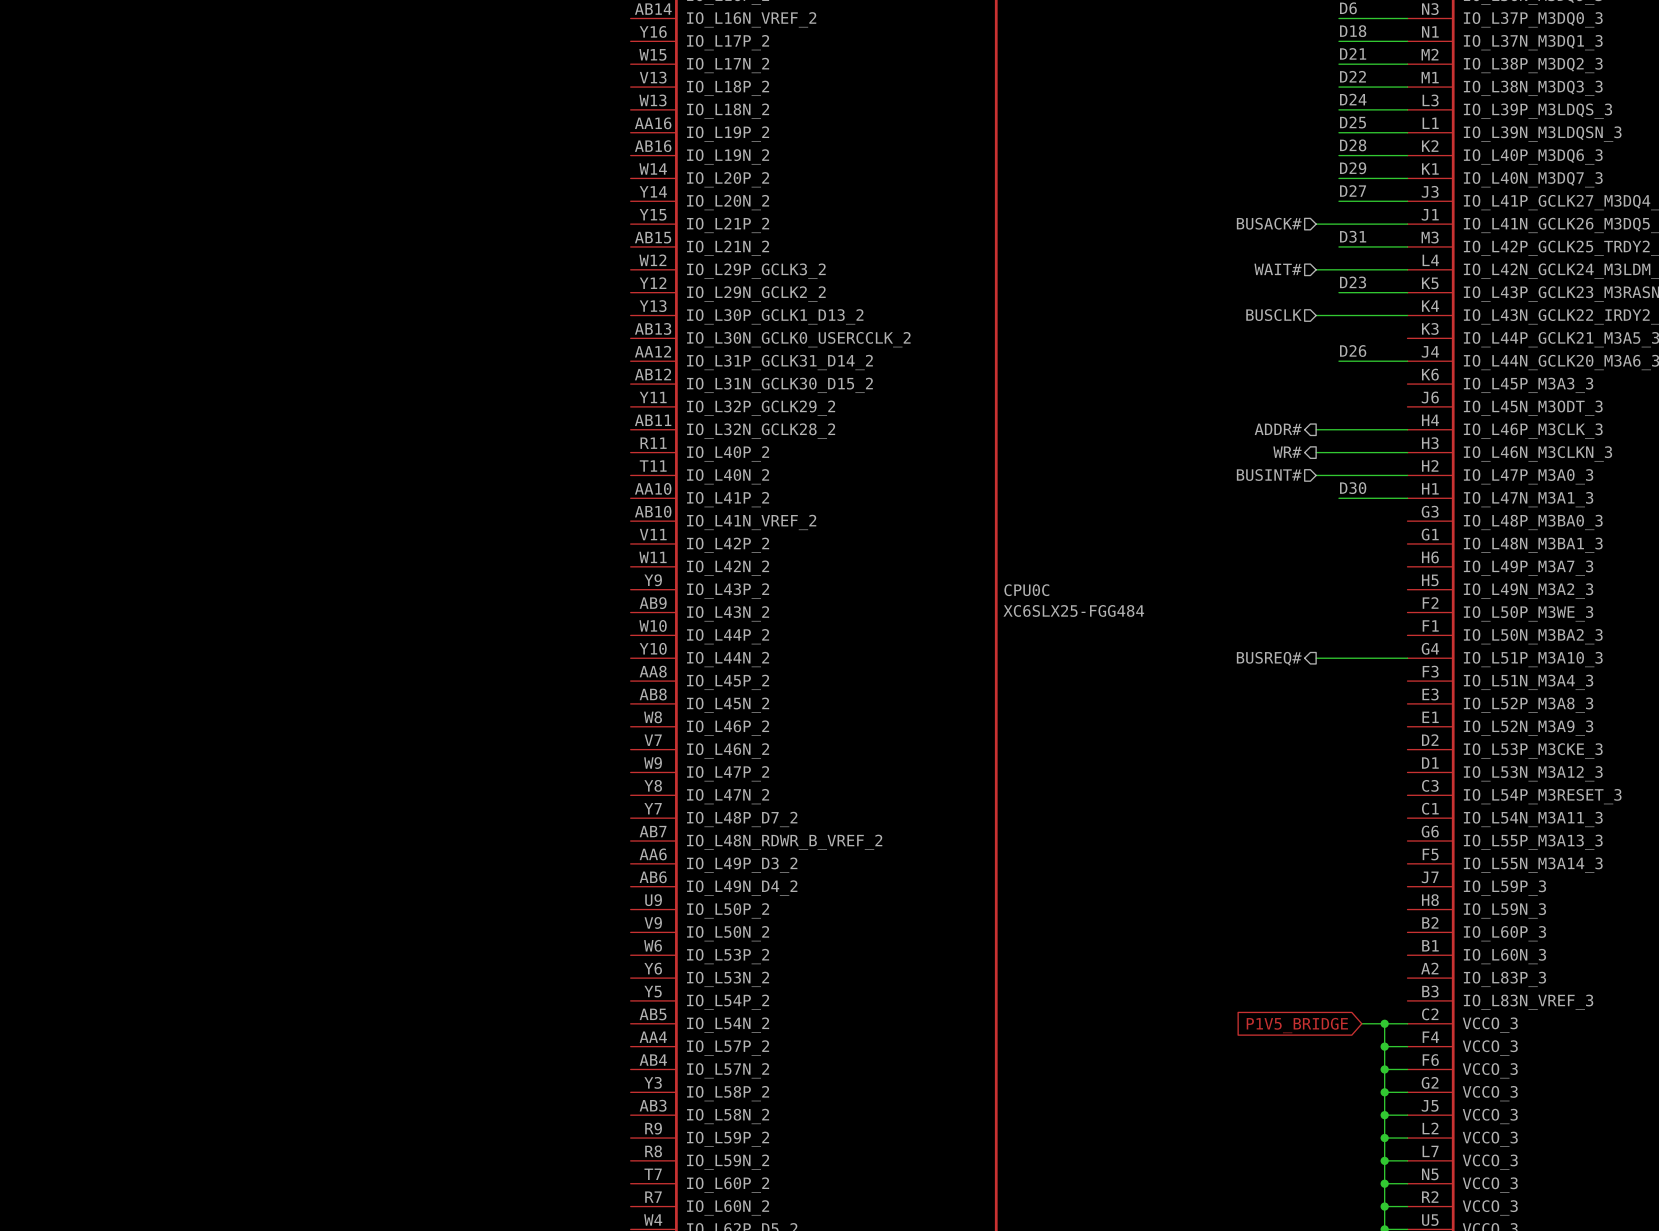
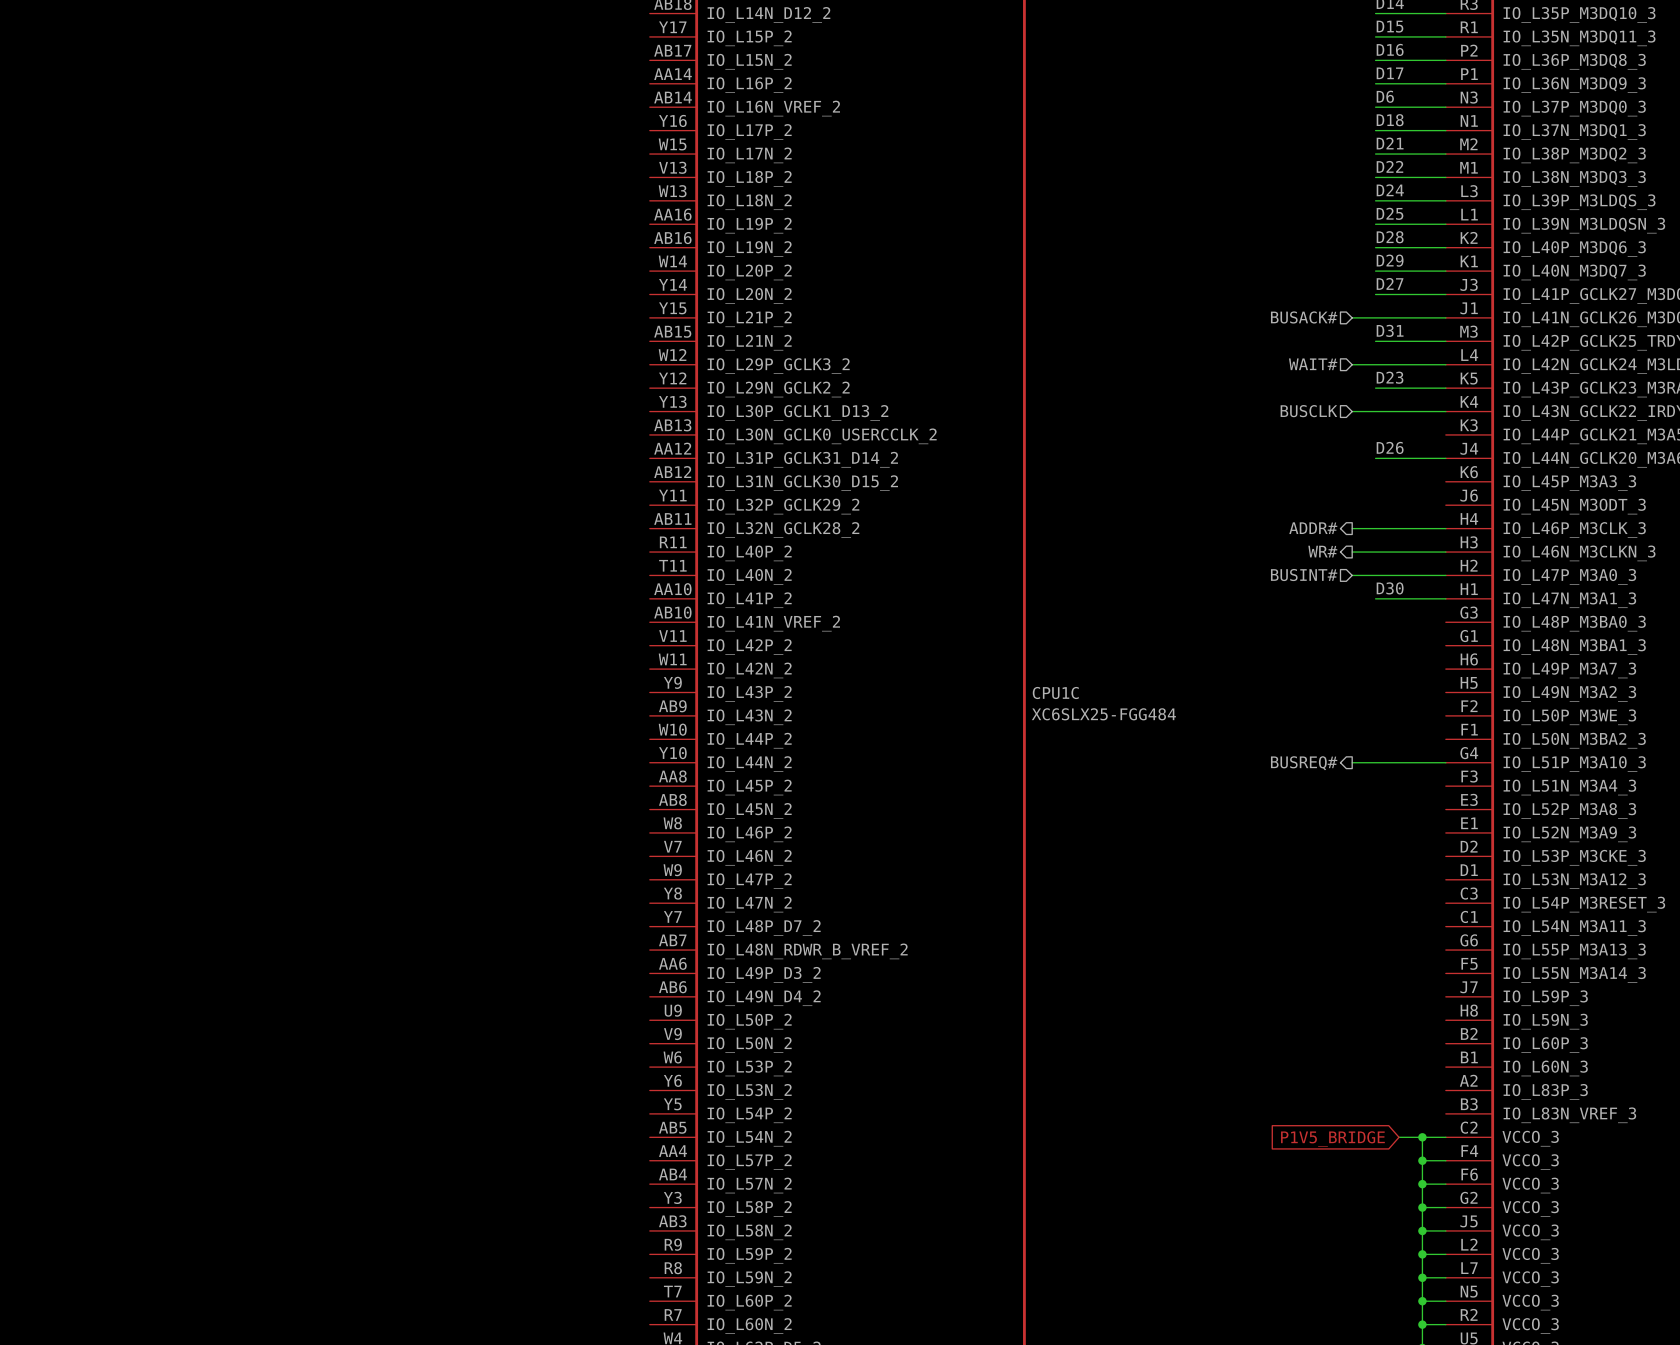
CPU0C name: CPU0C (1026, 590) -> CPU1C (1055, 693)

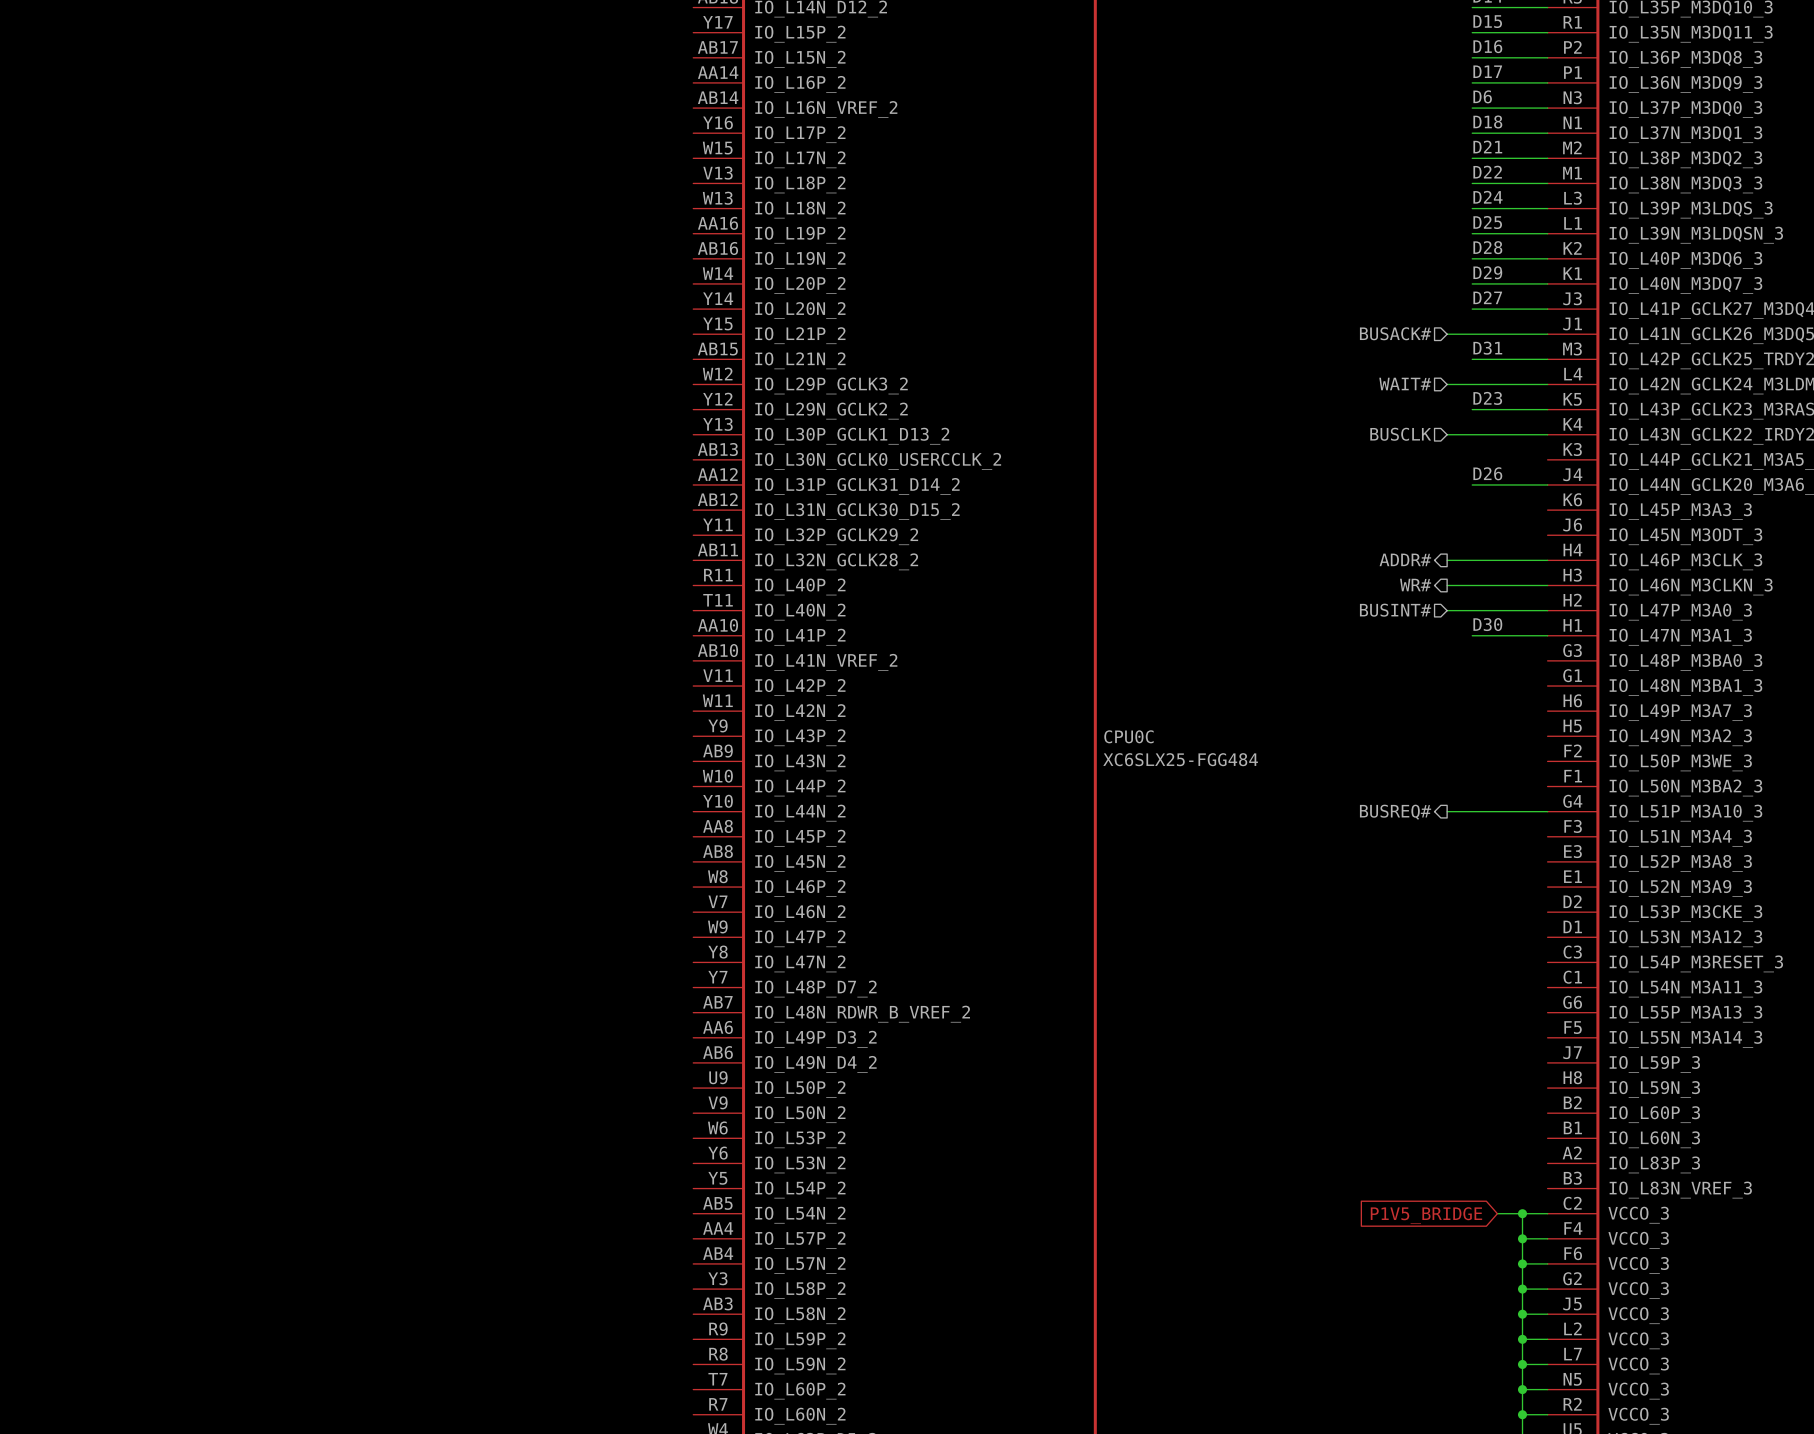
CPU1C name: CPU1C (1055, 693) -> CPU0C (1128, 736)

